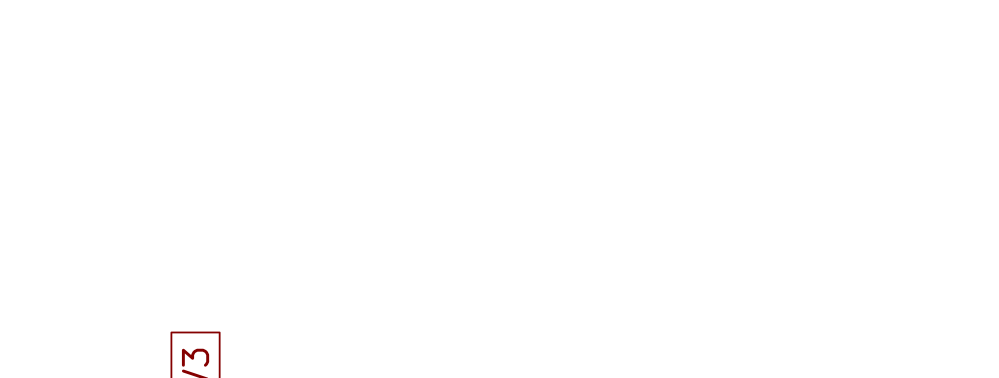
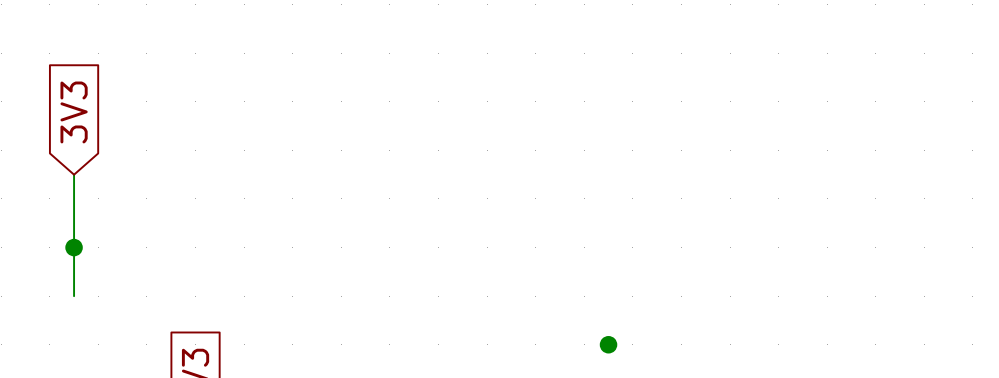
global label: none -> 3V3 (74, 112)
wire: none -> (74, 174) (74, 296)
junction: none -> (74, 247)
junction: none -> (608, 344)

